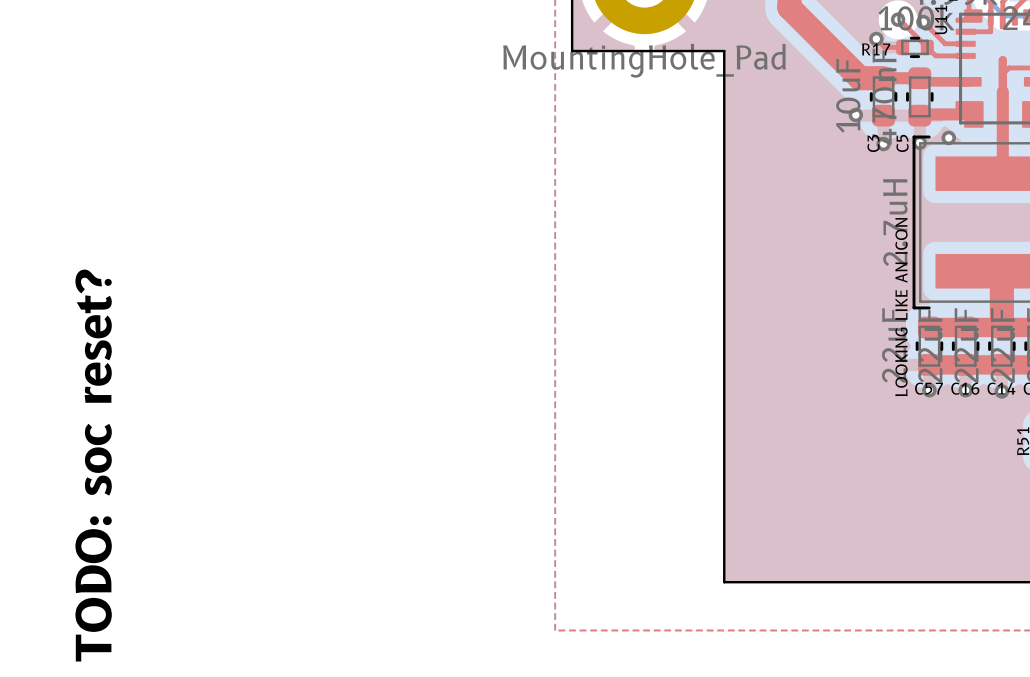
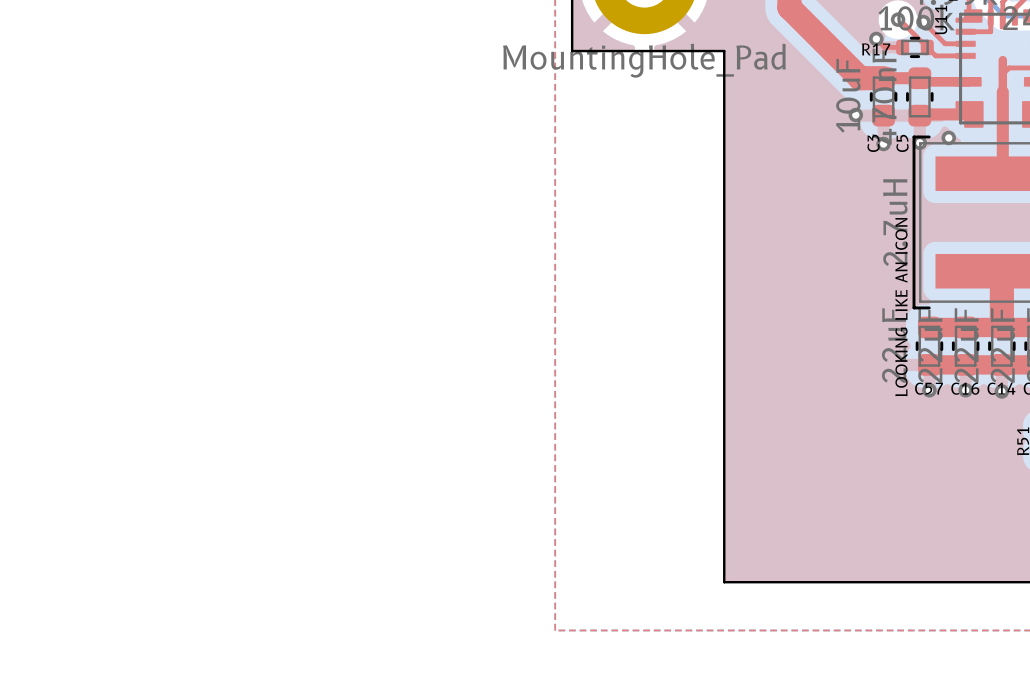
text: TODO: soc reset? (93, 465) -> none

